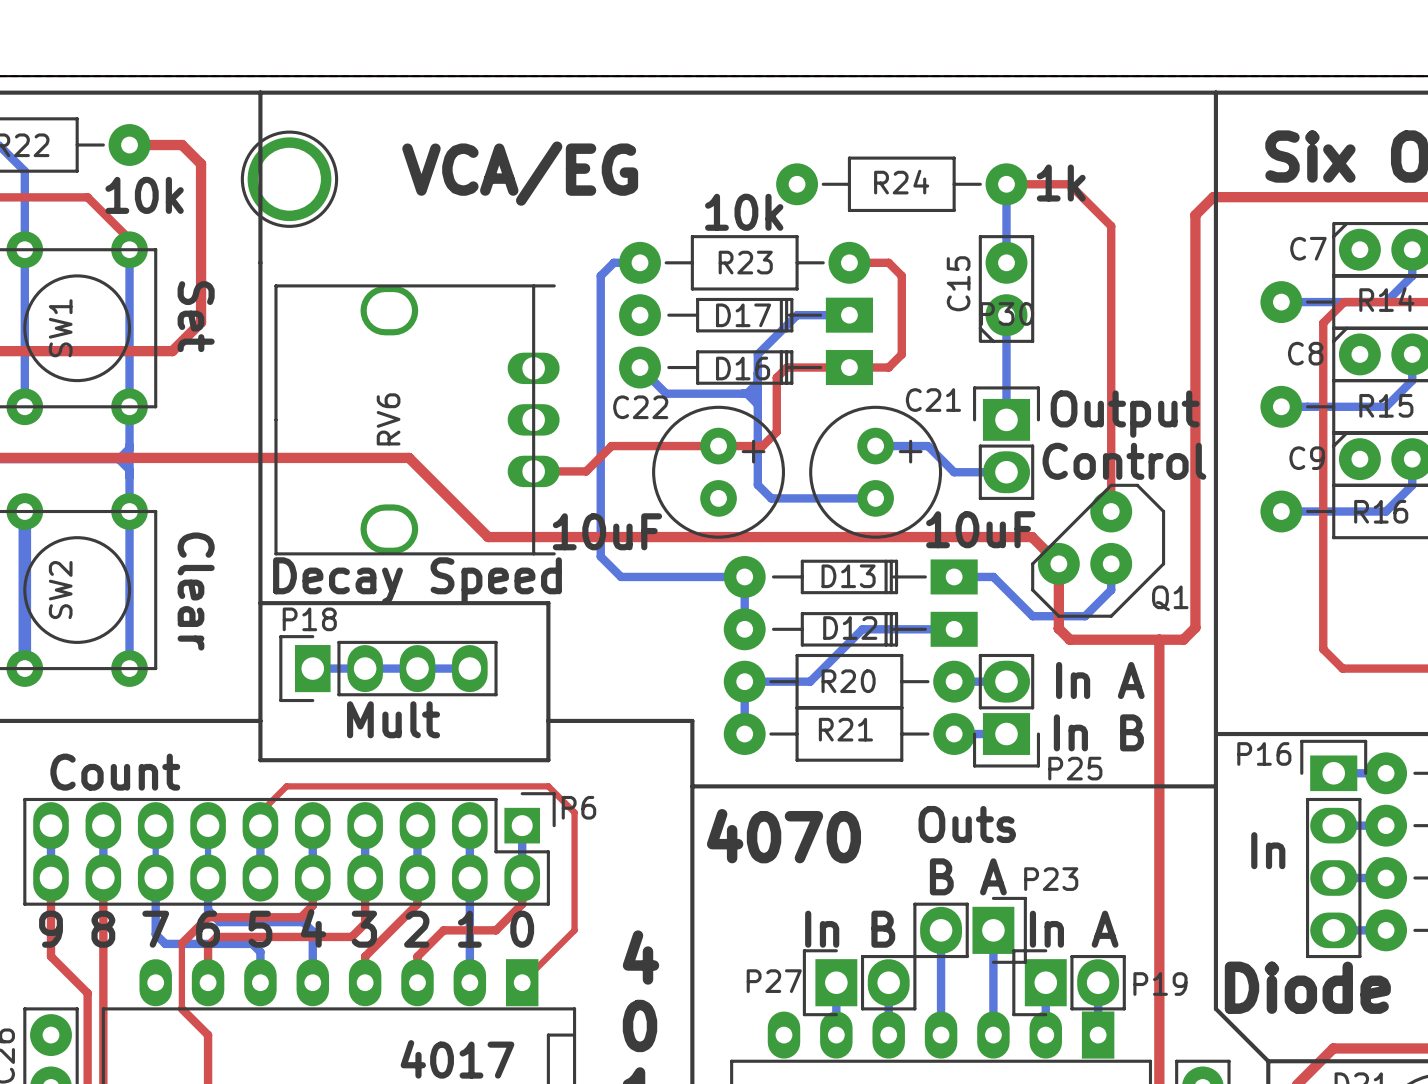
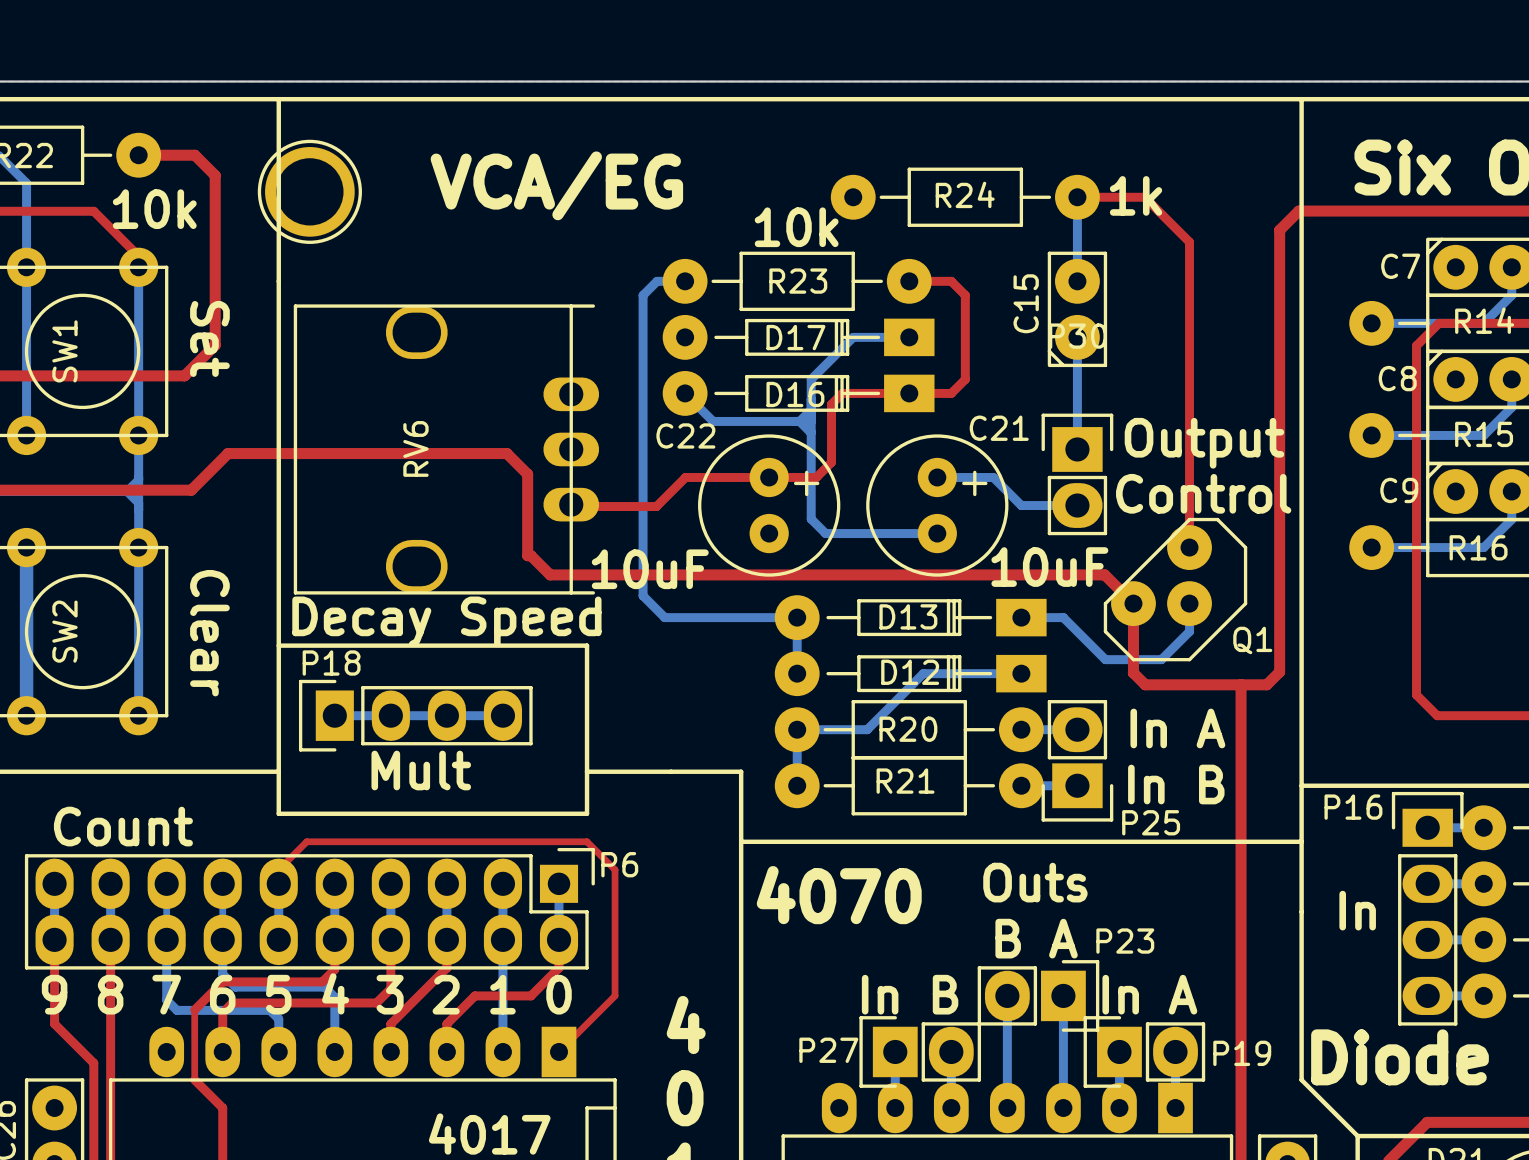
top track: (640, 446) (611, 446) (586, 471) (533, 471) -> (685, 477) (656, 506) (588, 506)
top track: (178, 457) (409, 457) (488, 537) (513, 537) -> (191, 490) (228, 453) (506, 453) (527, 474) (527, 555) (530, 555) (550, 574)

